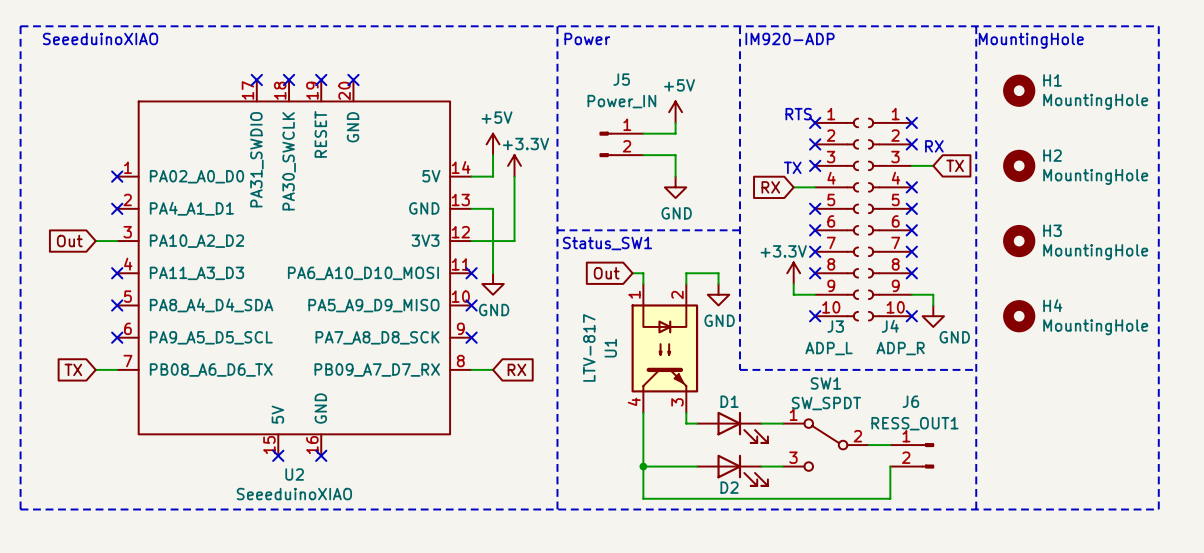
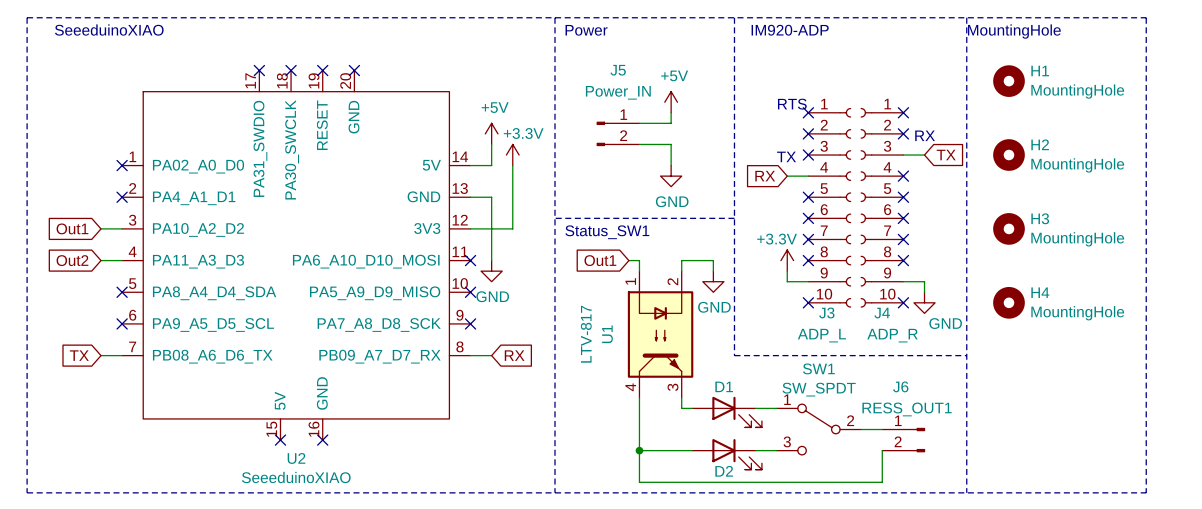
global label: Out (69, 241) -> Out1 (72, 228)
global label: none -> Out2 (72, 260)
wire: none -> (101, 260) (122, 260)
no-connect mark: (117, 273) -> none
global label: Out (606, 273) -> Out1 (600, 260)

